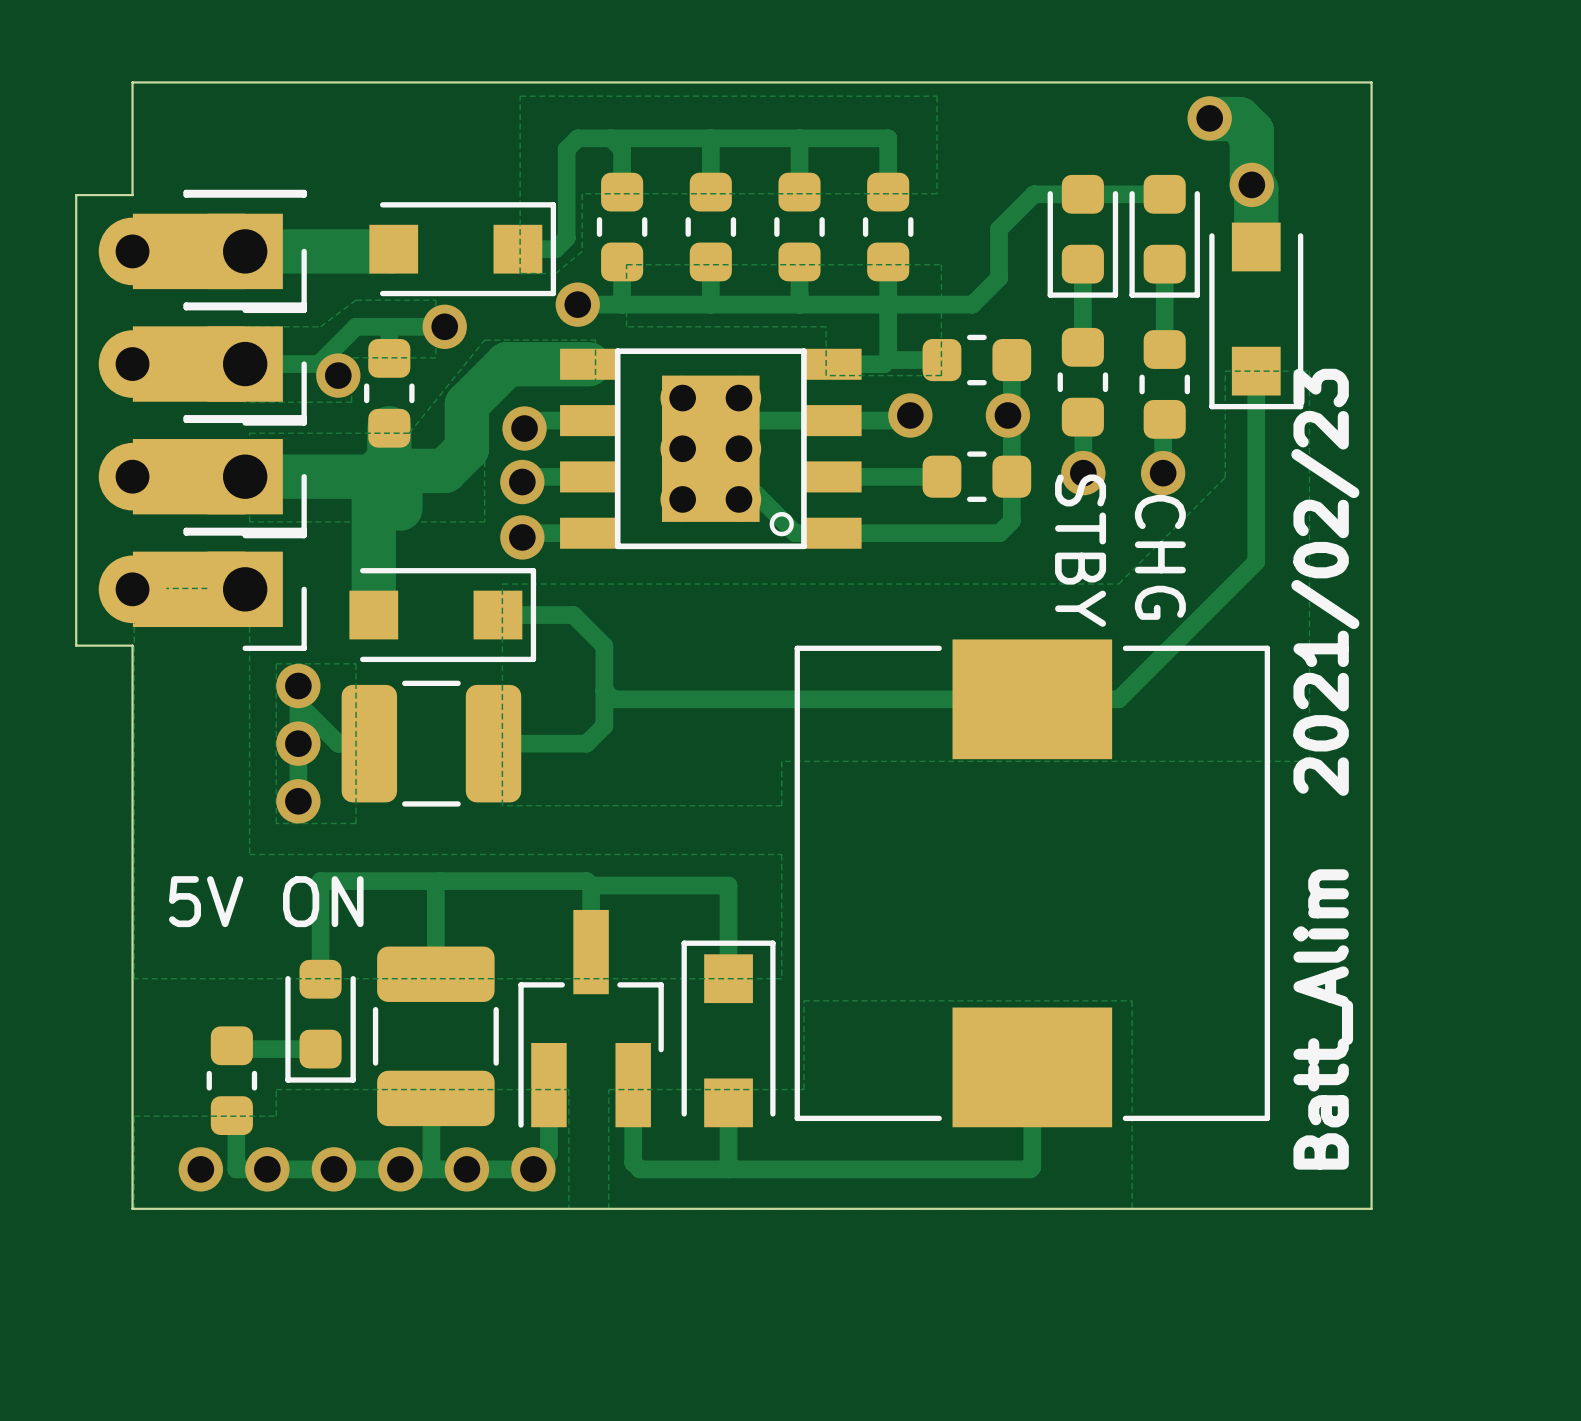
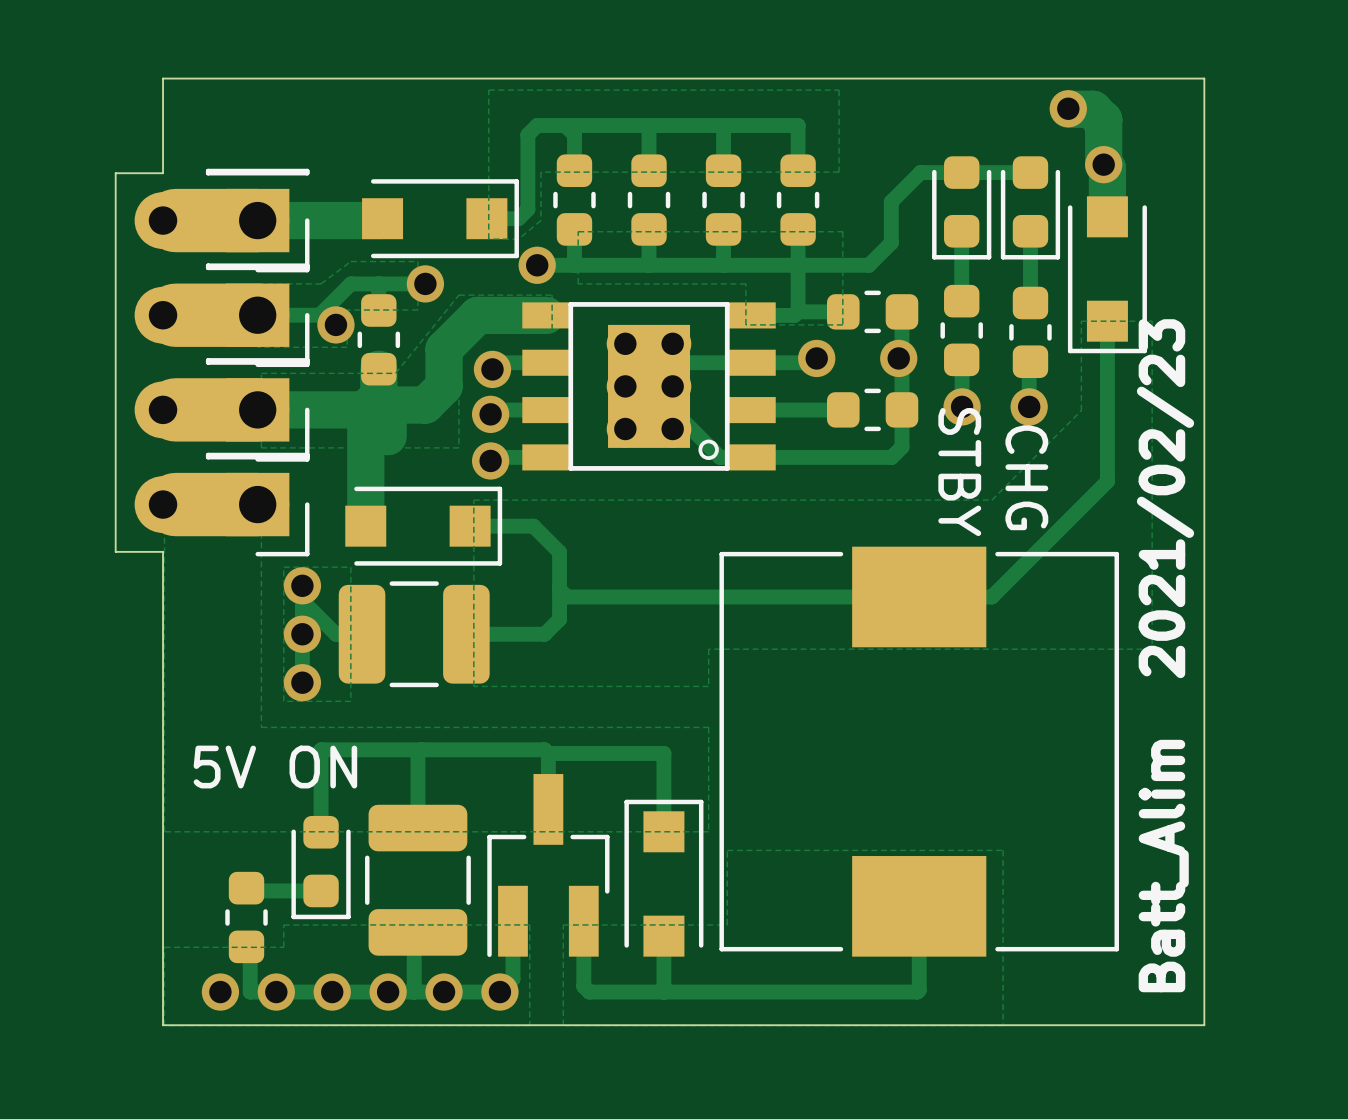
part footprint: [98, 189, 307, 314] -> [134, 168, 310, 273]
part footprint: [98, 302, 307, 426] -> [134, 263, 310, 368]
part footprint: [98, 415, 307, 539] -> [134, 358, 310, 462]
part footprint: [98, 527, 307, 651] -> [134, 452, 310, 557]

